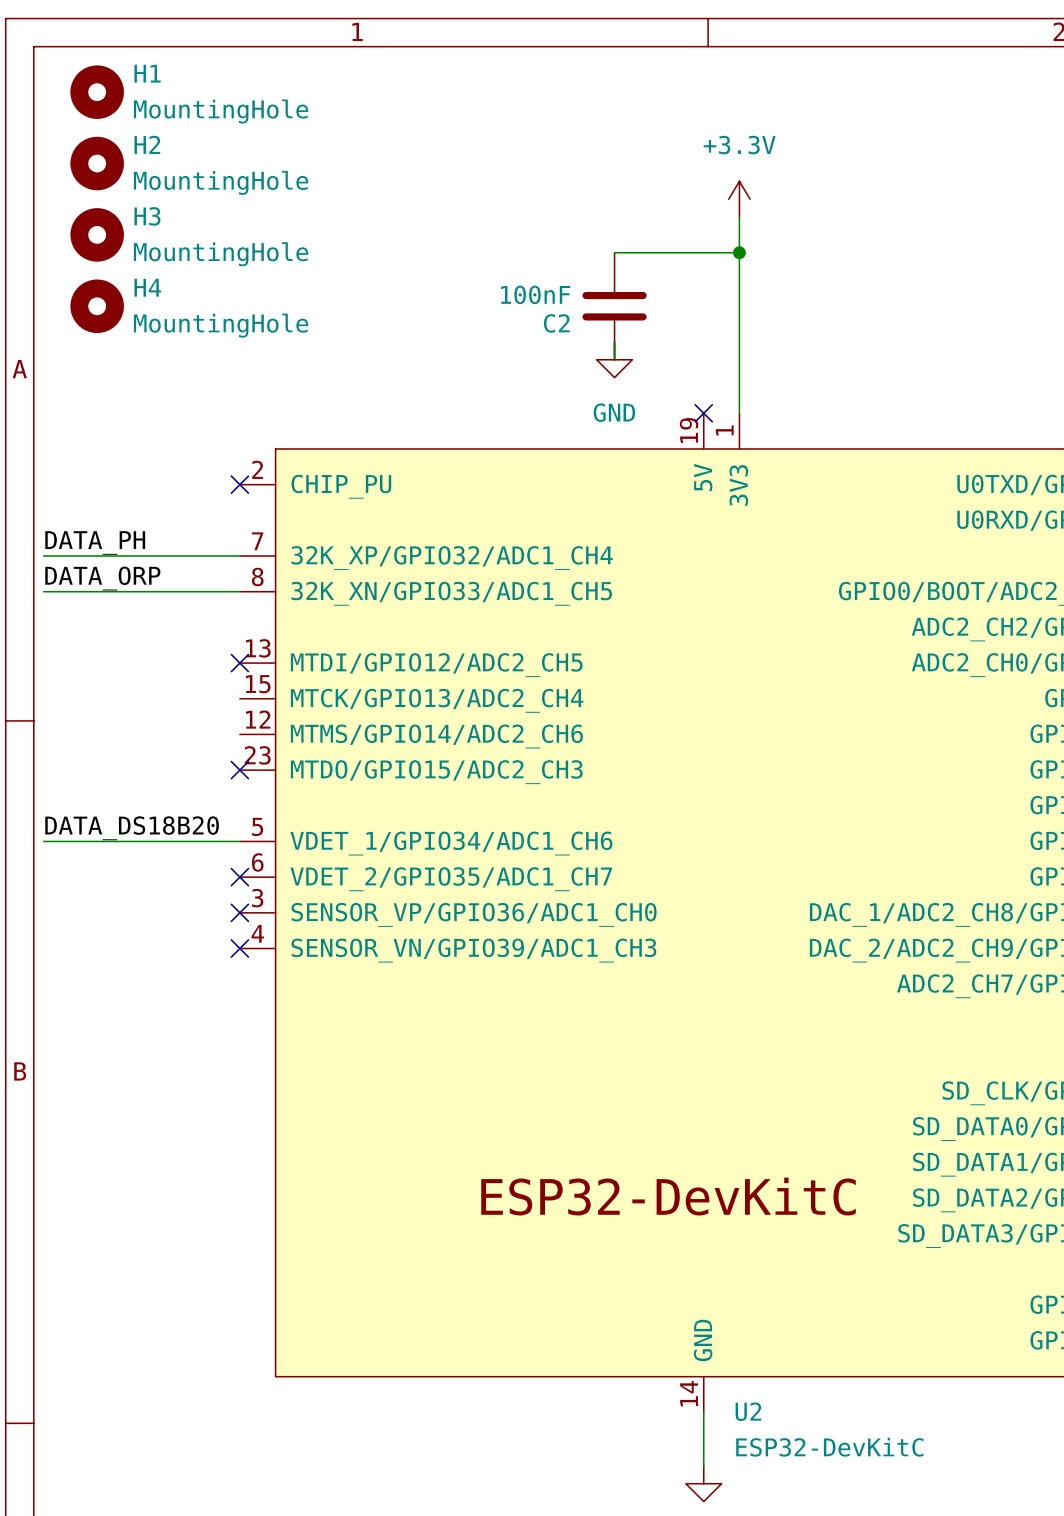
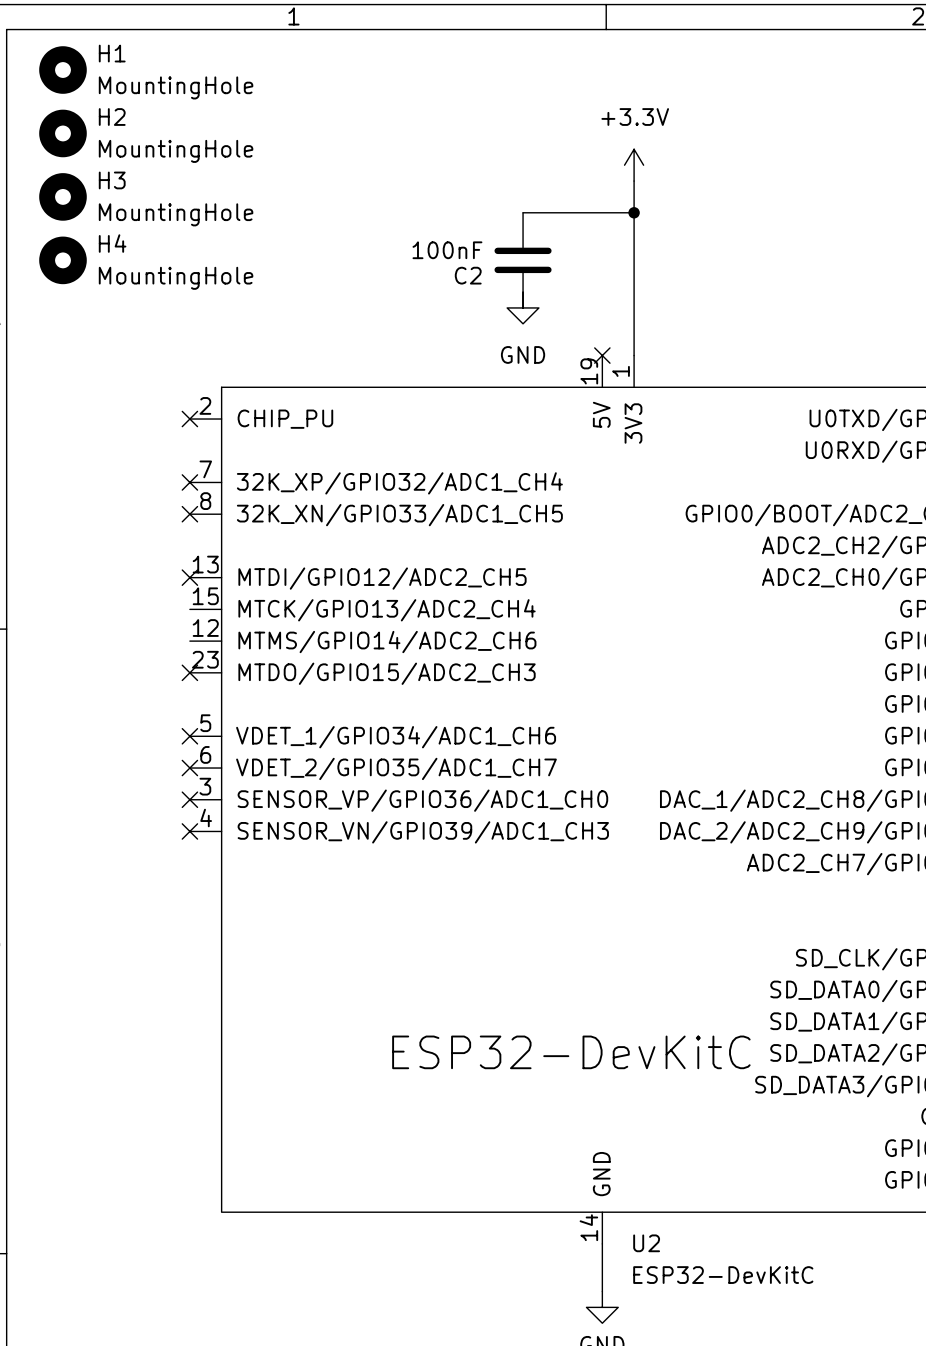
label: DATA_PH (95, 542) -> none
wire: (43, 556) (239, 556) -> none
no-connect mark: none -> (189, 482)
label: DATA_ORP (102, 578) -> none
wire: (43, 591) (239, 591) -> none
no-connect mark: none -> (189, 514)
label: DATA_DS18B20 (132, 828) -> none
wire: (43, 841) (239, 841) -> none
no-connect mark: none -> (189, 736)

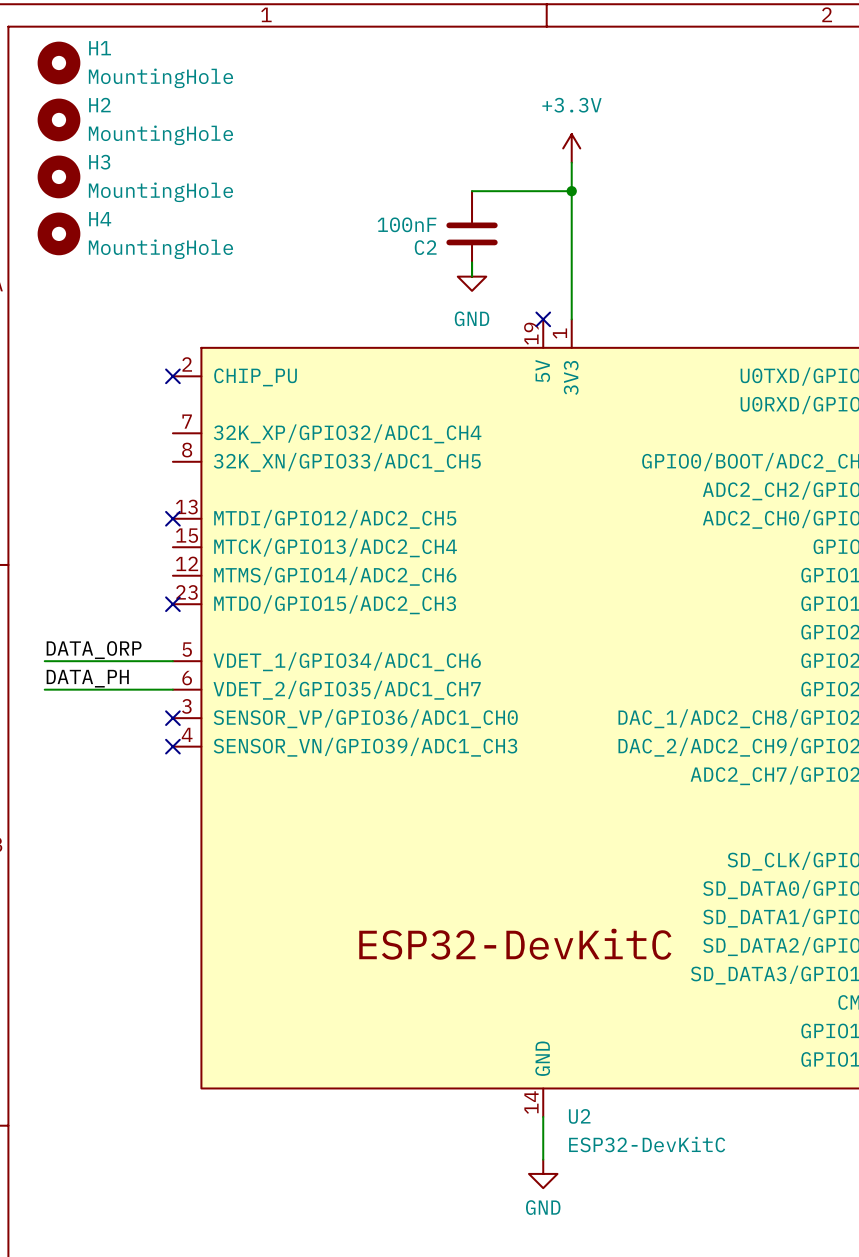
no-connect mark: (189, 482) -> none
no-connect mark: (189, 514) -> none
label: none -> DATA_ORP (94, 650)
wire: none -> (44, 661) (172, 661)
no-connect mark: (189, 736) -> none
label: none -> DATA_PH (87, 678)
wire: none -> (44, 689) (172, 689)
no-connect mark: (189, 768) -> none

